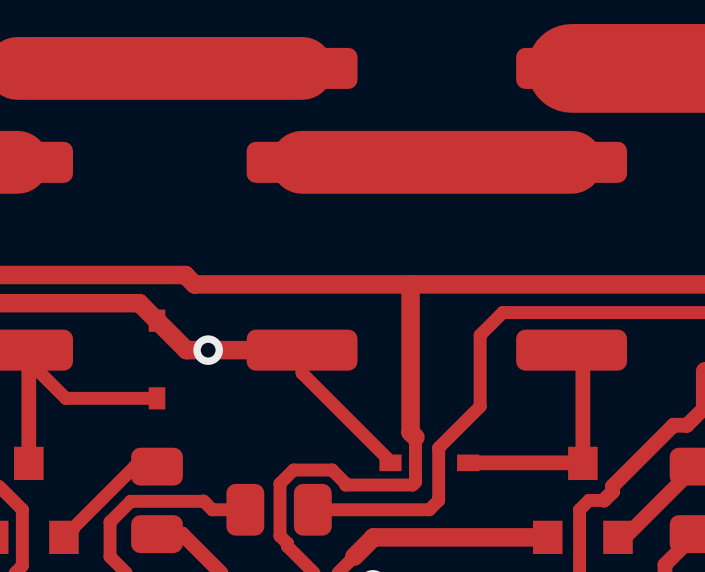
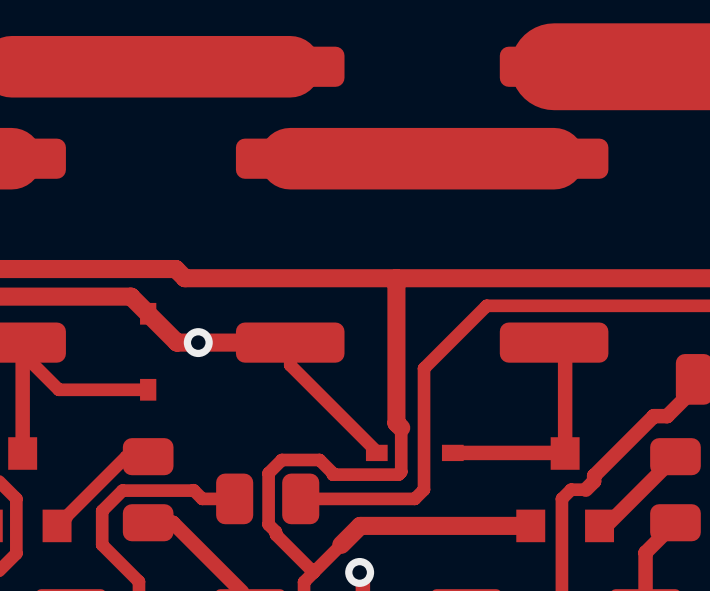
top track: (480, 335) (480, 406) (438, 447) -> (464, 327) (424, 368) (424, 438)

